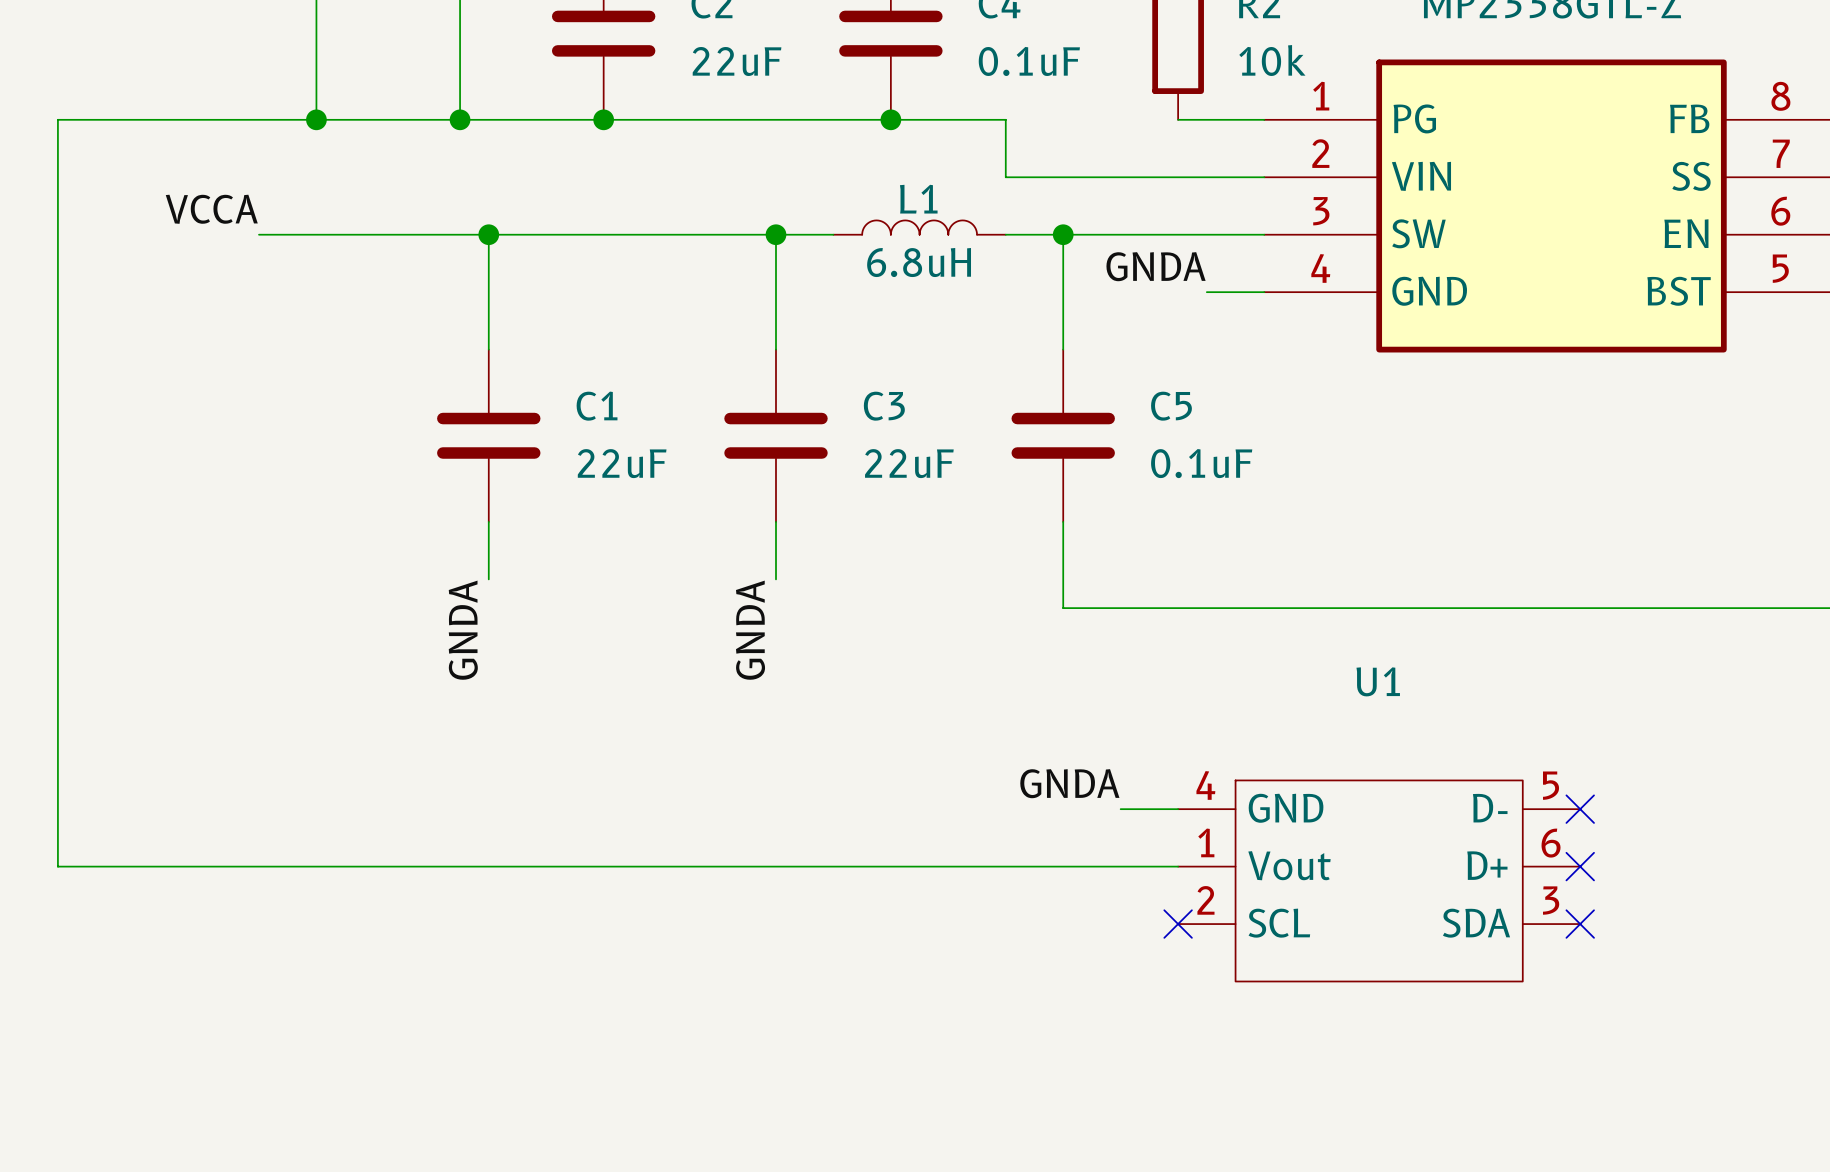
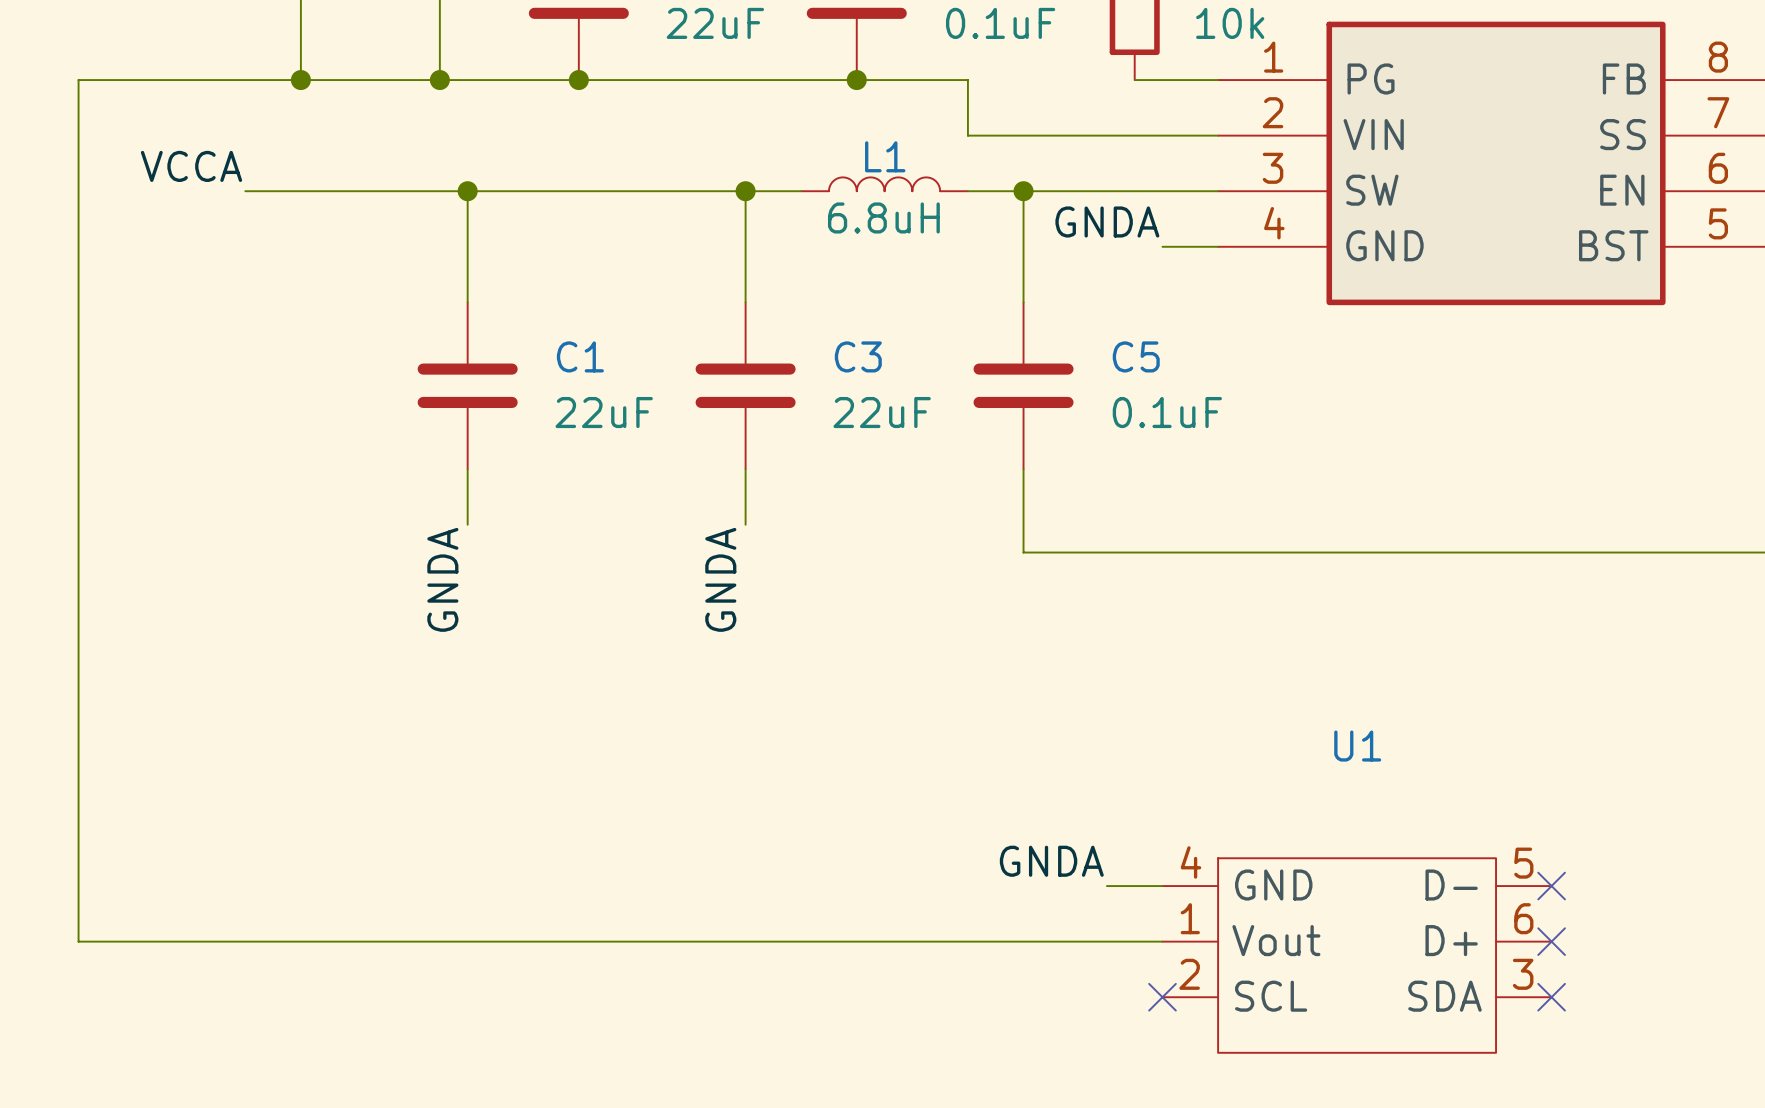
wire: (86, 119) (57, 119) (57, 866) (1178, 866) -> (78, 80) (78, 941) (1162, 941)
U1 name position: U1 (1378, 681) -> U1 (1357, 746)
label position: GNDA (1069, 783) -> GNDA (1051, 861)
wire: (1120, 809) (1178, 809) -> (1106, 886) (1162, 886)
no-connect mark: (1580, 809) -> none
no-connect mark: (1580, 866) -> none
U1 position: (1379, 880) -> (1357, 955)
no-connect mark: (1178, 924) -> none
no-connect mark position: (1580, 924) -> (1551, 886)
no-connect mark: none -> (1551, 941)
no-connect mark: none -> (1162, 997)
no-connect mark: none -> (1551, 997)

